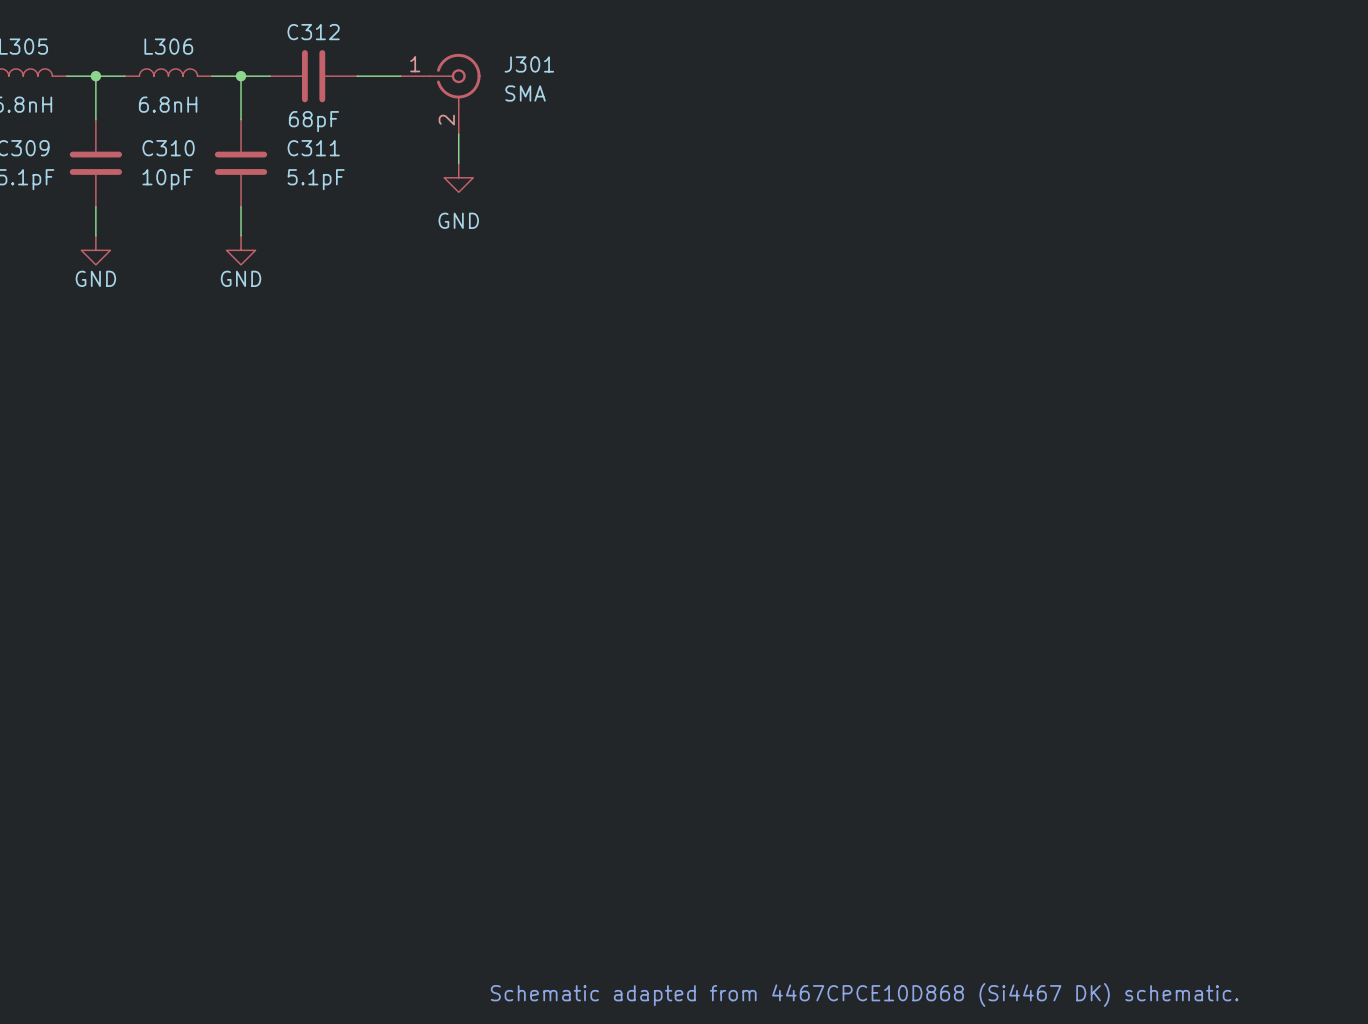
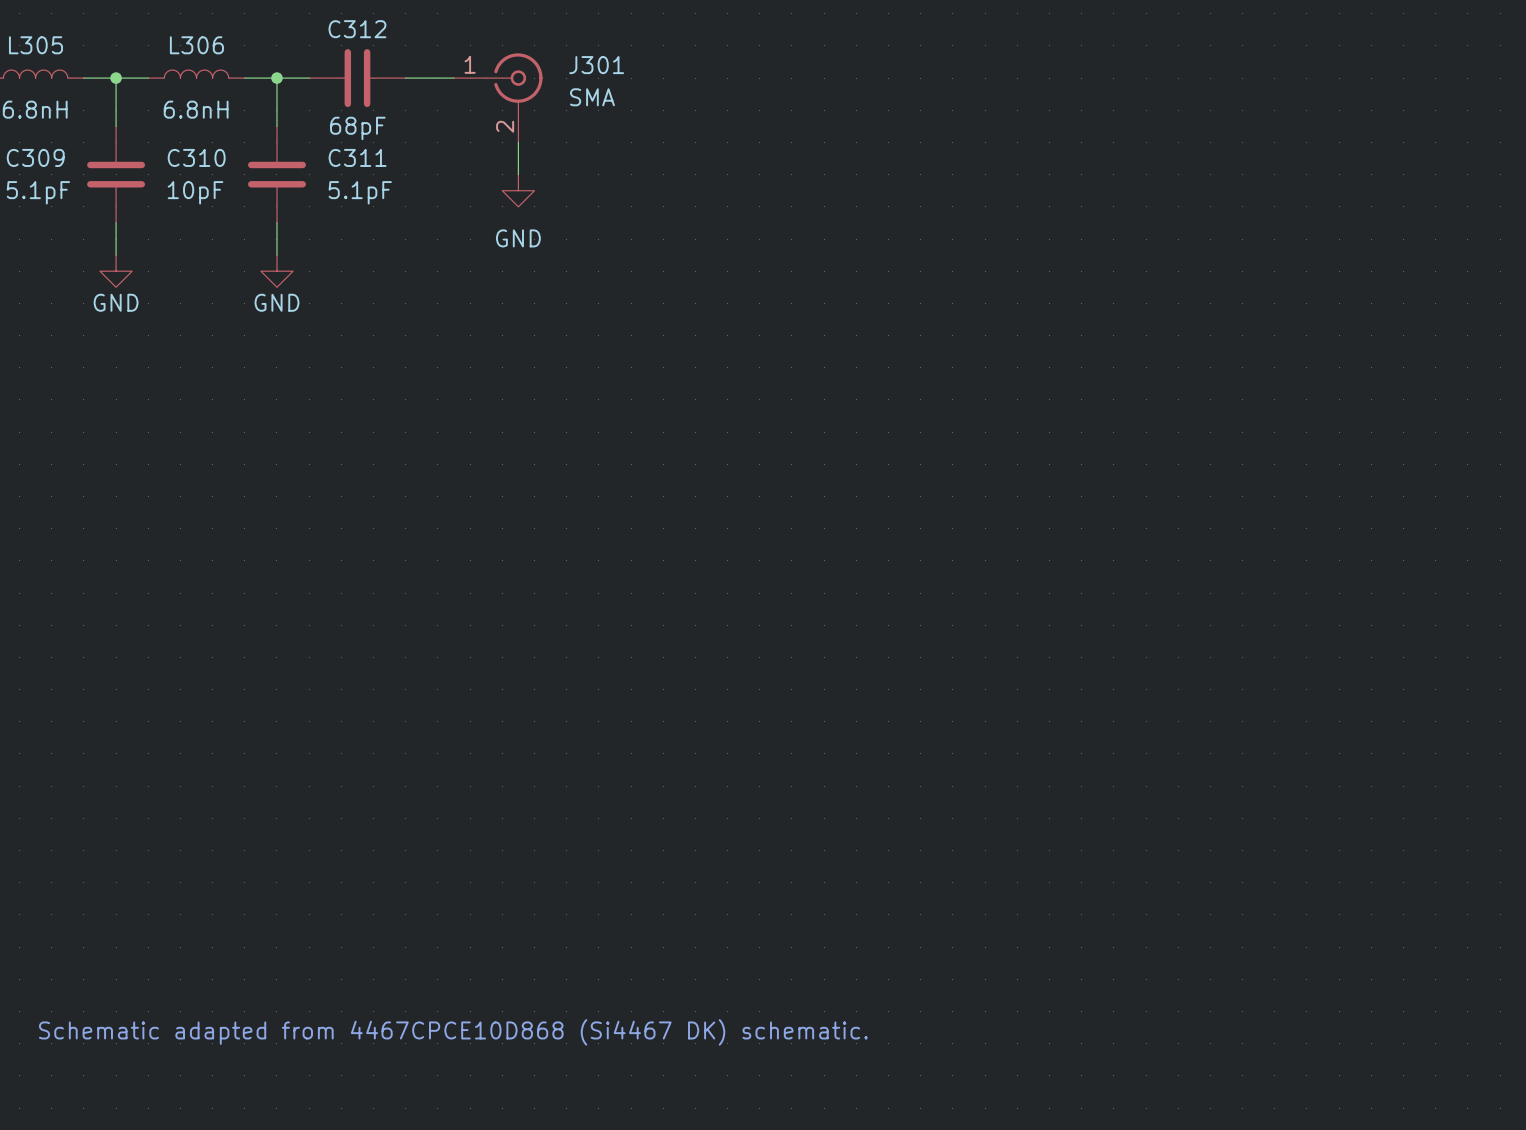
text: none -> Schematic adapted from 4467CPCE10D868 (Si4467 DK) schematic. (453, 1032)
text: Schematic adapted from 4467CPCE10D868 (Si4467 DK) schematic. (864, 994) -> none

